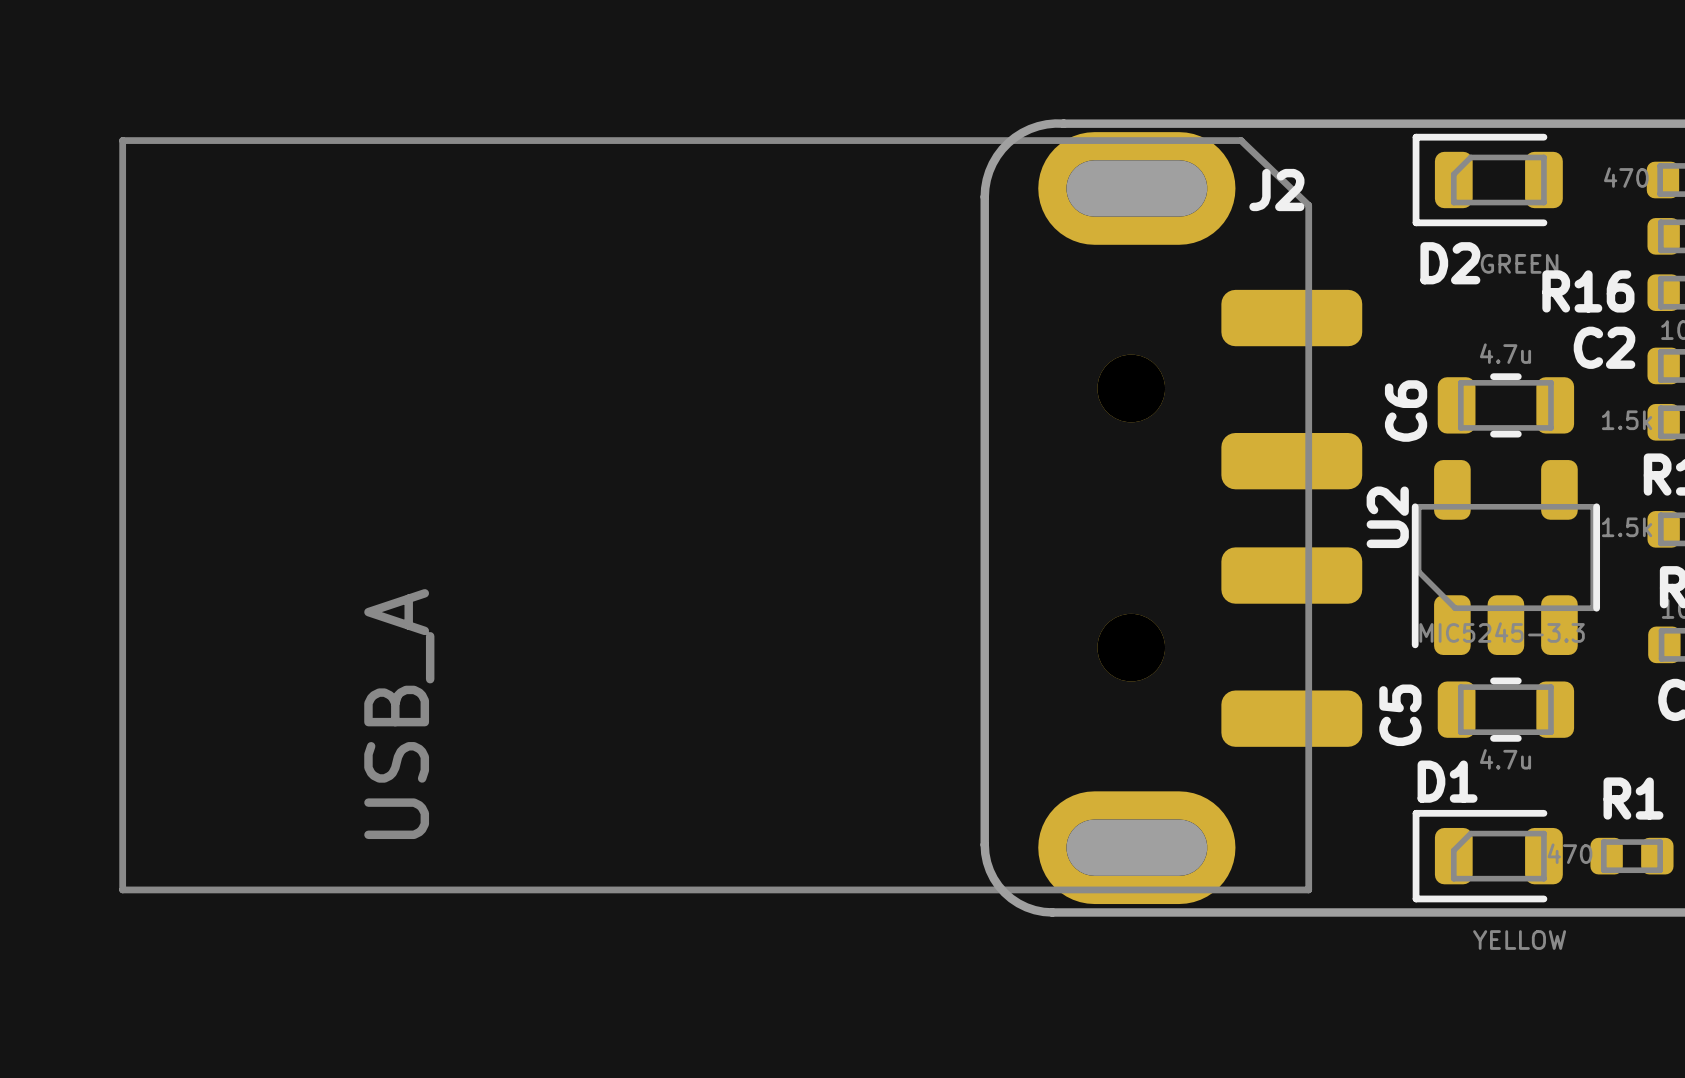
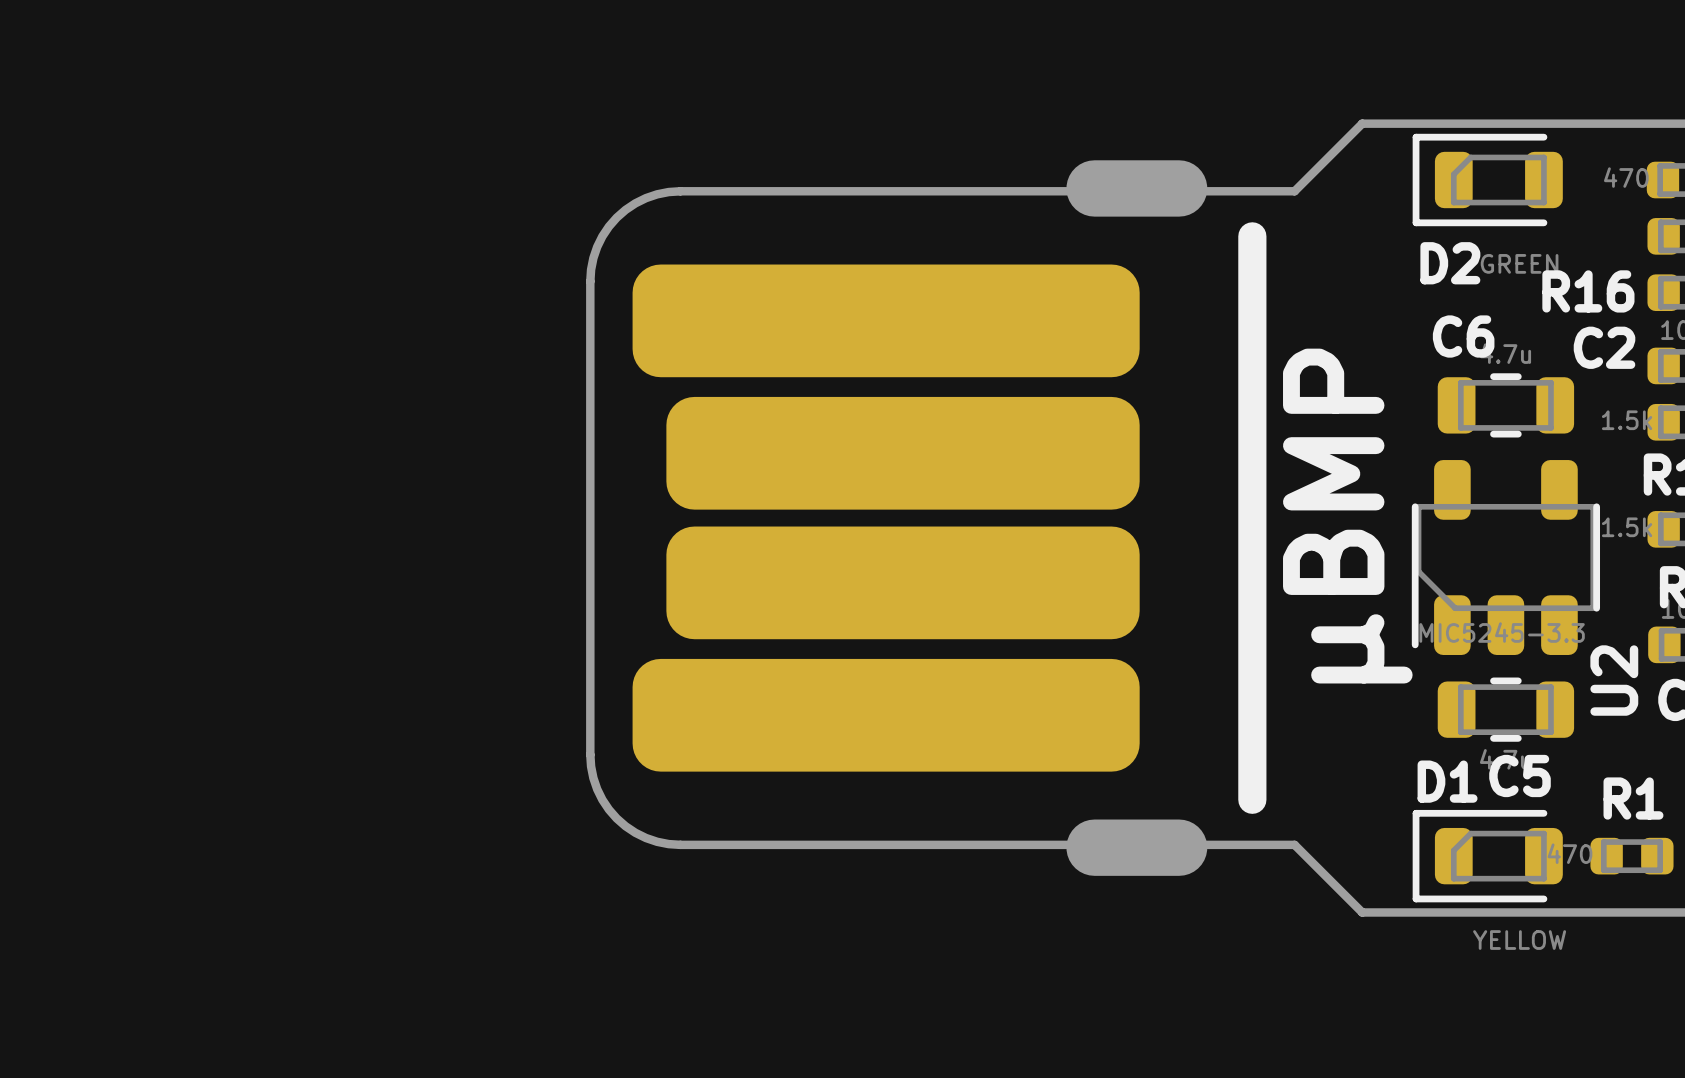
board edge: (1362, 123) (1046, 124) (1022, 132) (1002, 149) (989, 171) (984, 196) (984, 844) (987, 862) (993, 878) (1004, 892) (1018, 903) (1043, 911) (1362, 912) -> (1362, 123) (1294, 191) (680, 191) (657, 194) (635, 203) (616, 217) (608, 226) (597, 246) (591, 269) (590, 281) (590, 754) (591, 766) (597, 789) (608, 809) (625, 826) (645, 838) (668, 844) (680, 844) (1294, 844) (1362, 912)
line: none -> (1252, 236) (1252, 799)
C6 name rotation: 0° (1406, 411) -> 90° clockwise (1463, 336)
C6 name position: C6 (1406, 411) -> C6 (1463, 336)
text: none -> µBMP (1347, 516)
U2 name position: U2 (1387, 517) -> U2 (1614, 680)
J2: USB_A (740, 518) -> none
part: none -> (886, 518)
C5 name rotation: 0° (1400, 715) -> 90° clockwise (1520, 775)
C5 name position: C5 (1400, 715) -> C5 (1520, 775)

